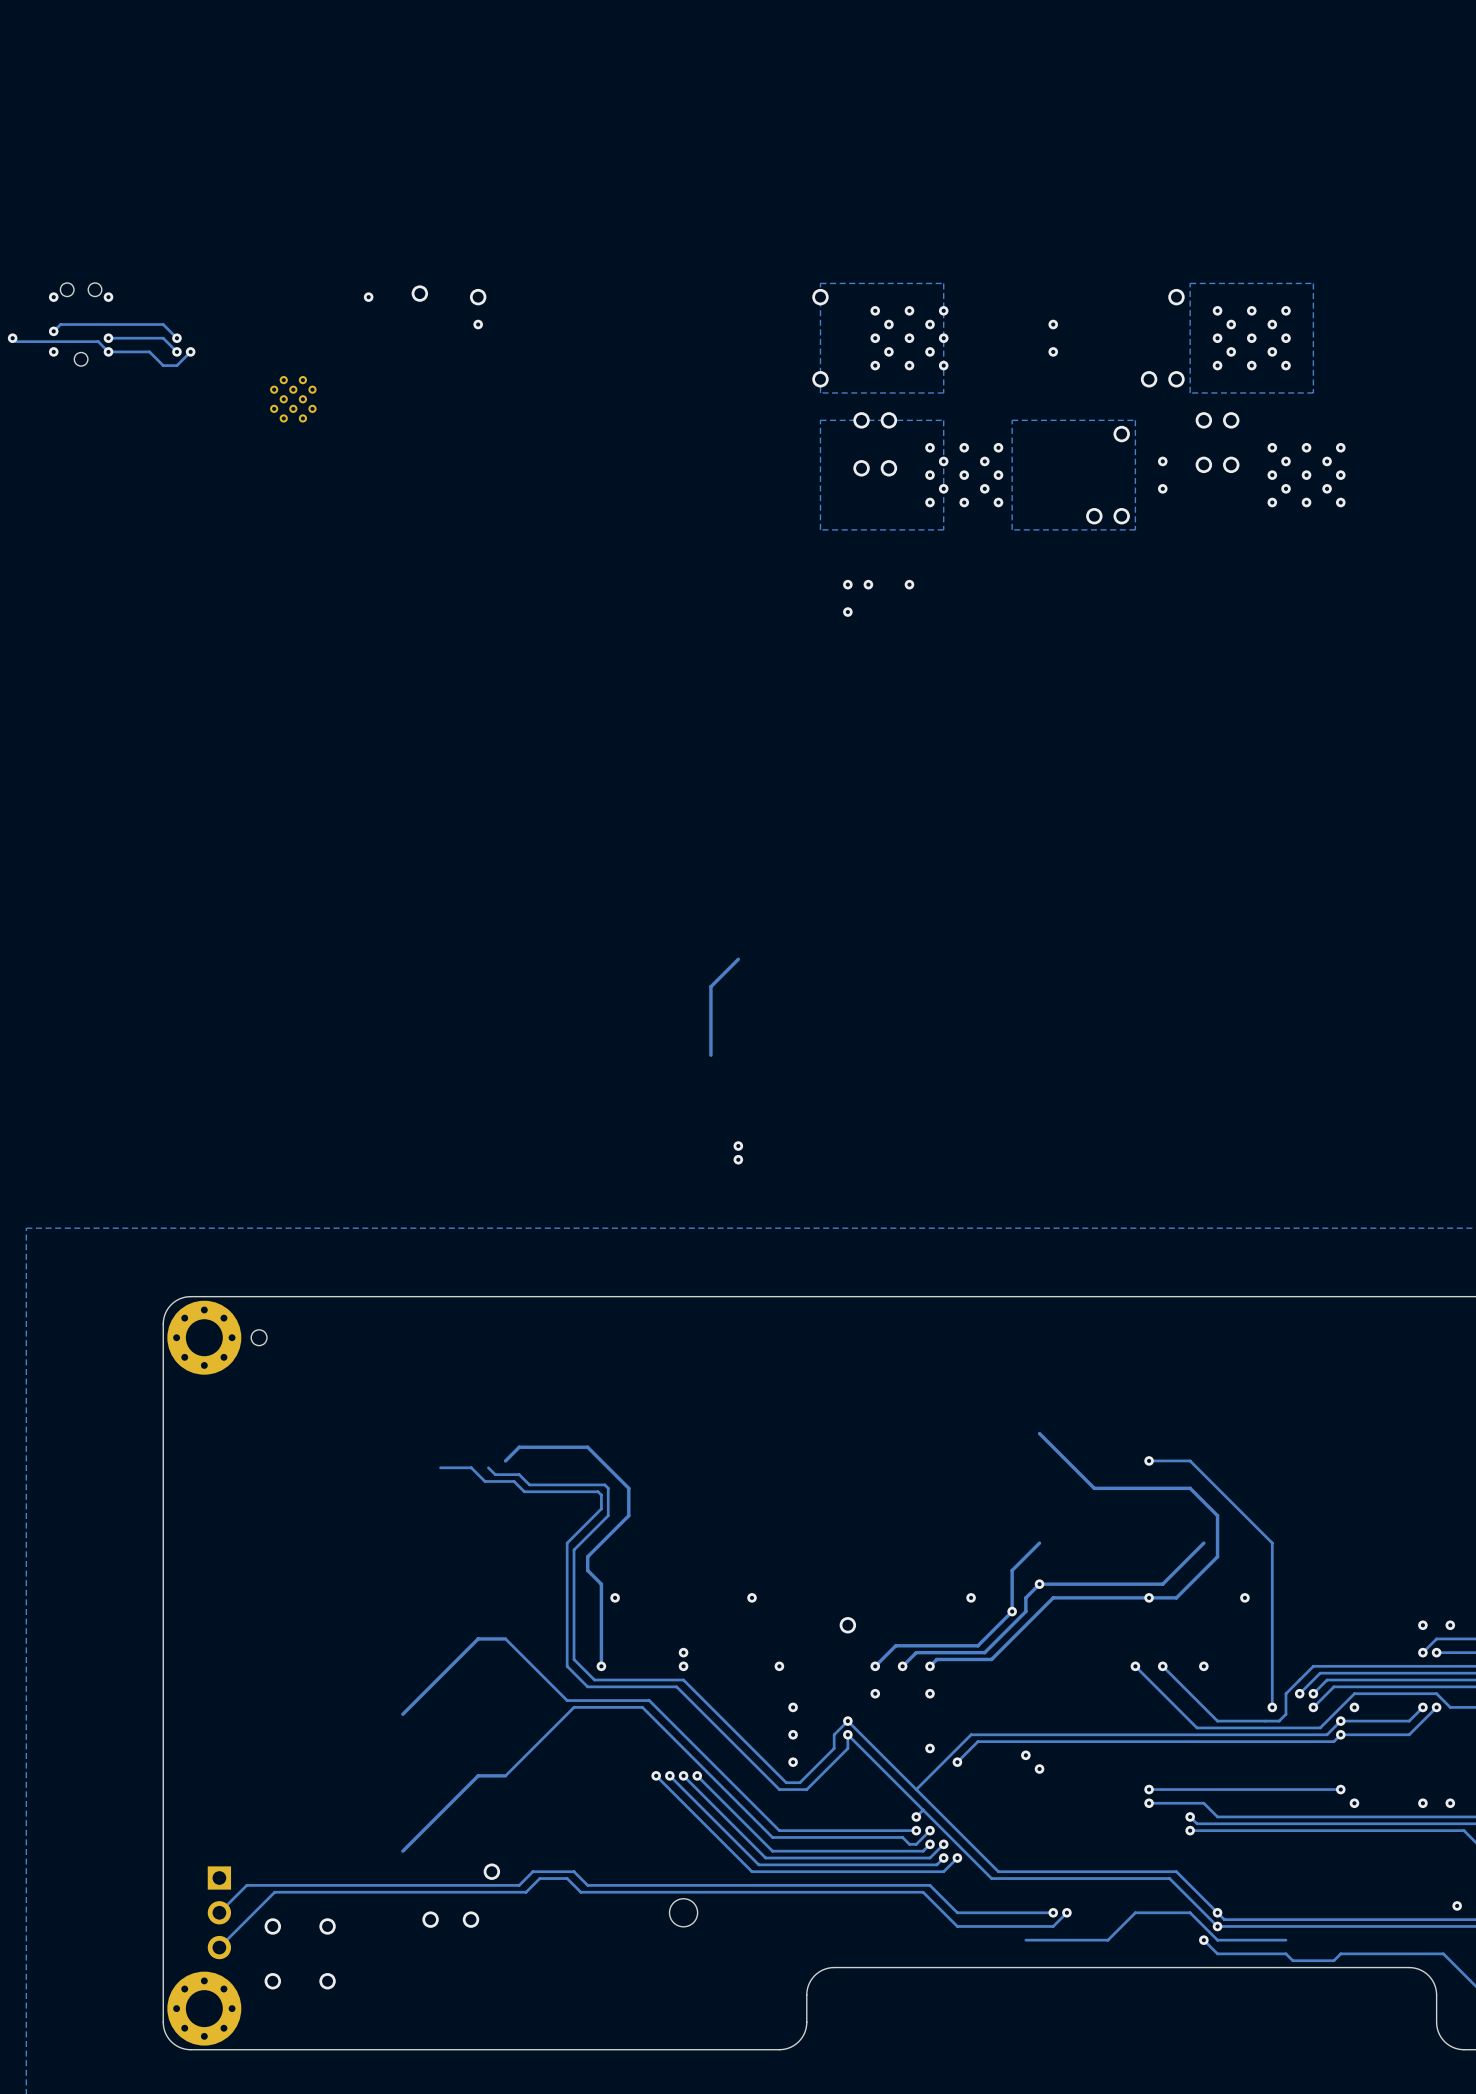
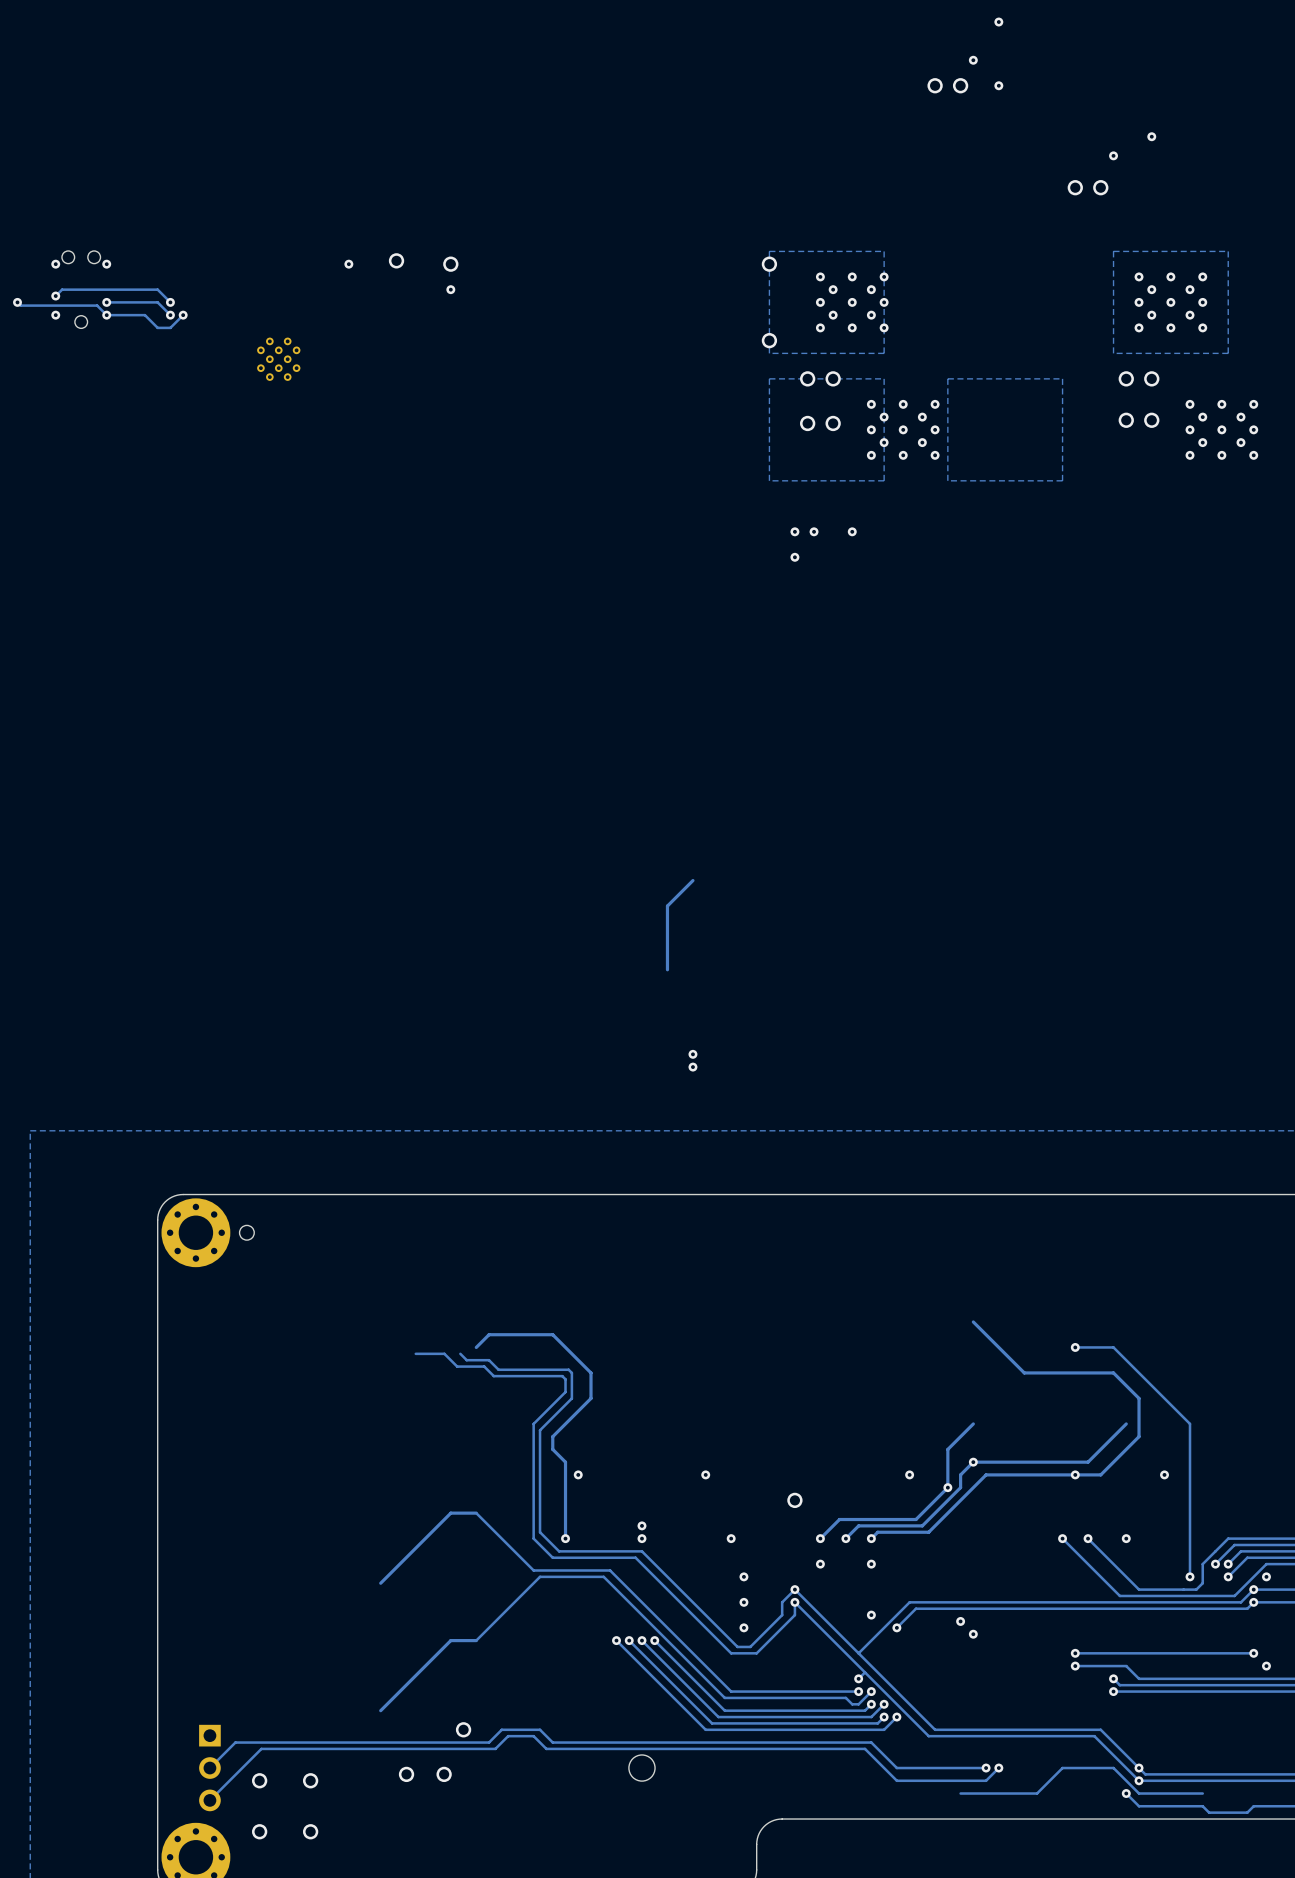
via: none -> (998, 22)
via: none -> (973, 60)
via: none -> (935, 85)
via: none -> (960, 85)
via: none -> (998, 85)
via: none -> (1151, 136)
via: none -> (1113, 155)
via: none -> (1075, 187)
via: none -> (1100, 187)
via: (1176, 297) -> none
via: (1053, 324) -> none
via: (1053, 351) -> none
via: (1149, 379) -> none
via: (1176, 379) -> none
via: (1121, 434) -> none
via: (1162, 461) -> none
via: (1162, 488) -> none
via: (1094, 516) -> none
via: (1121, 516) -> none

